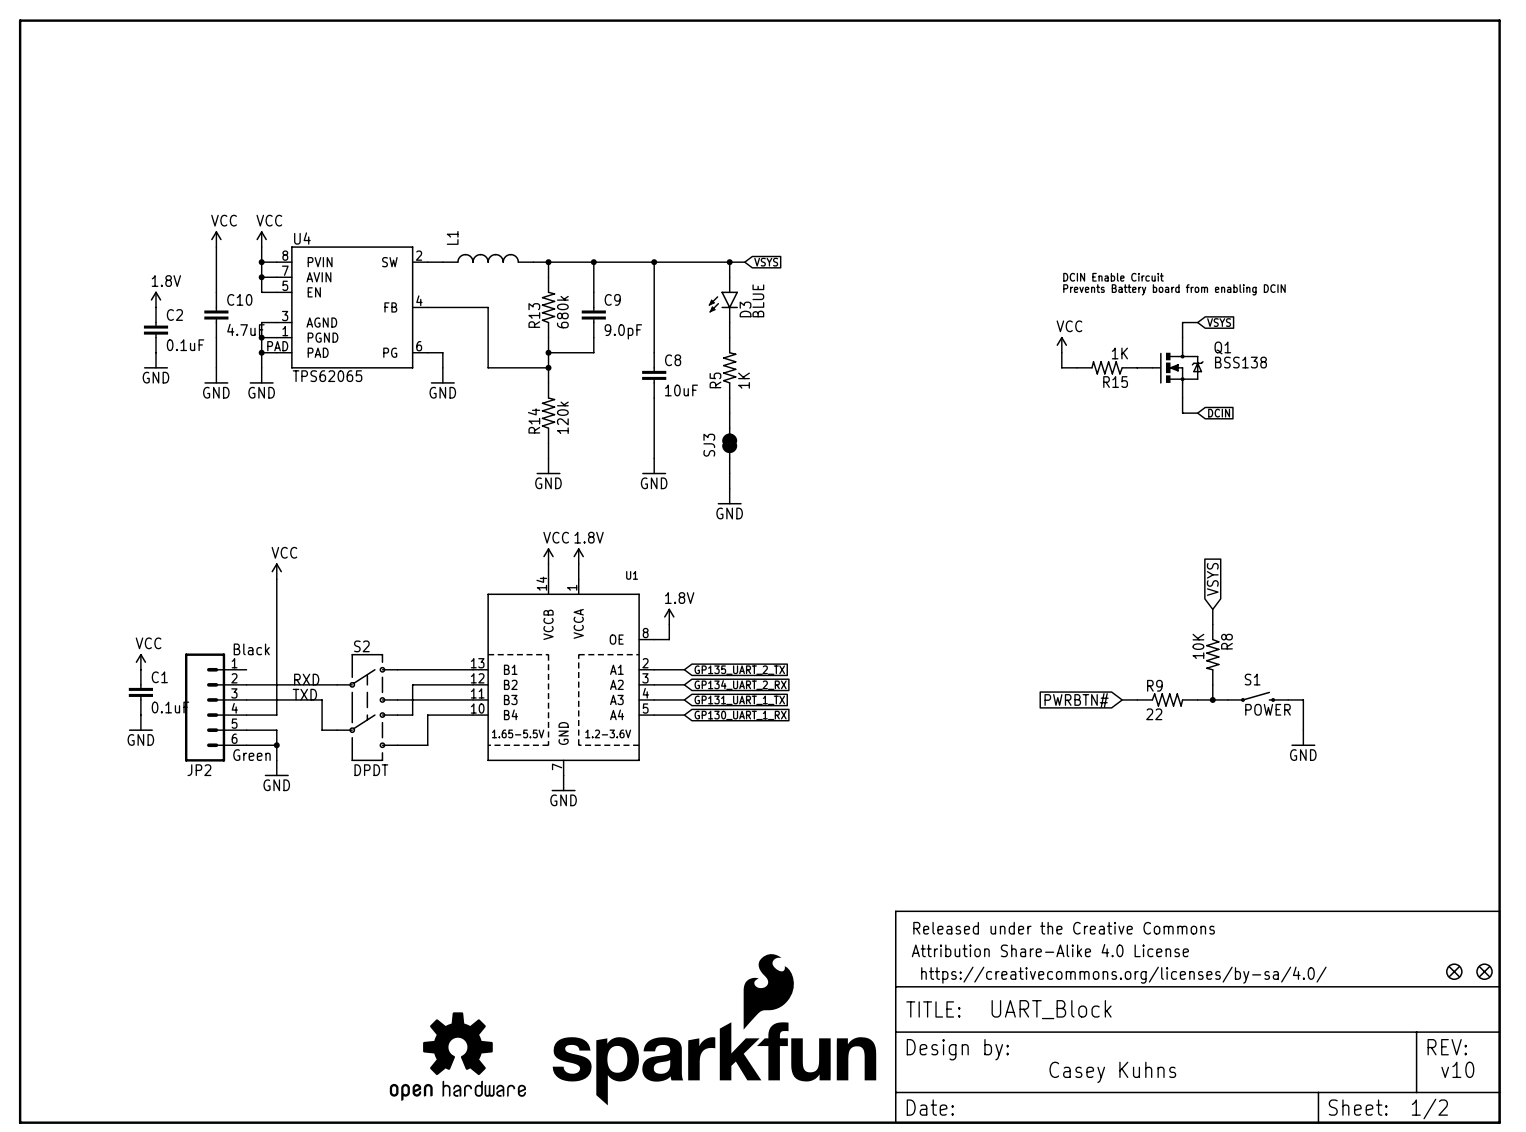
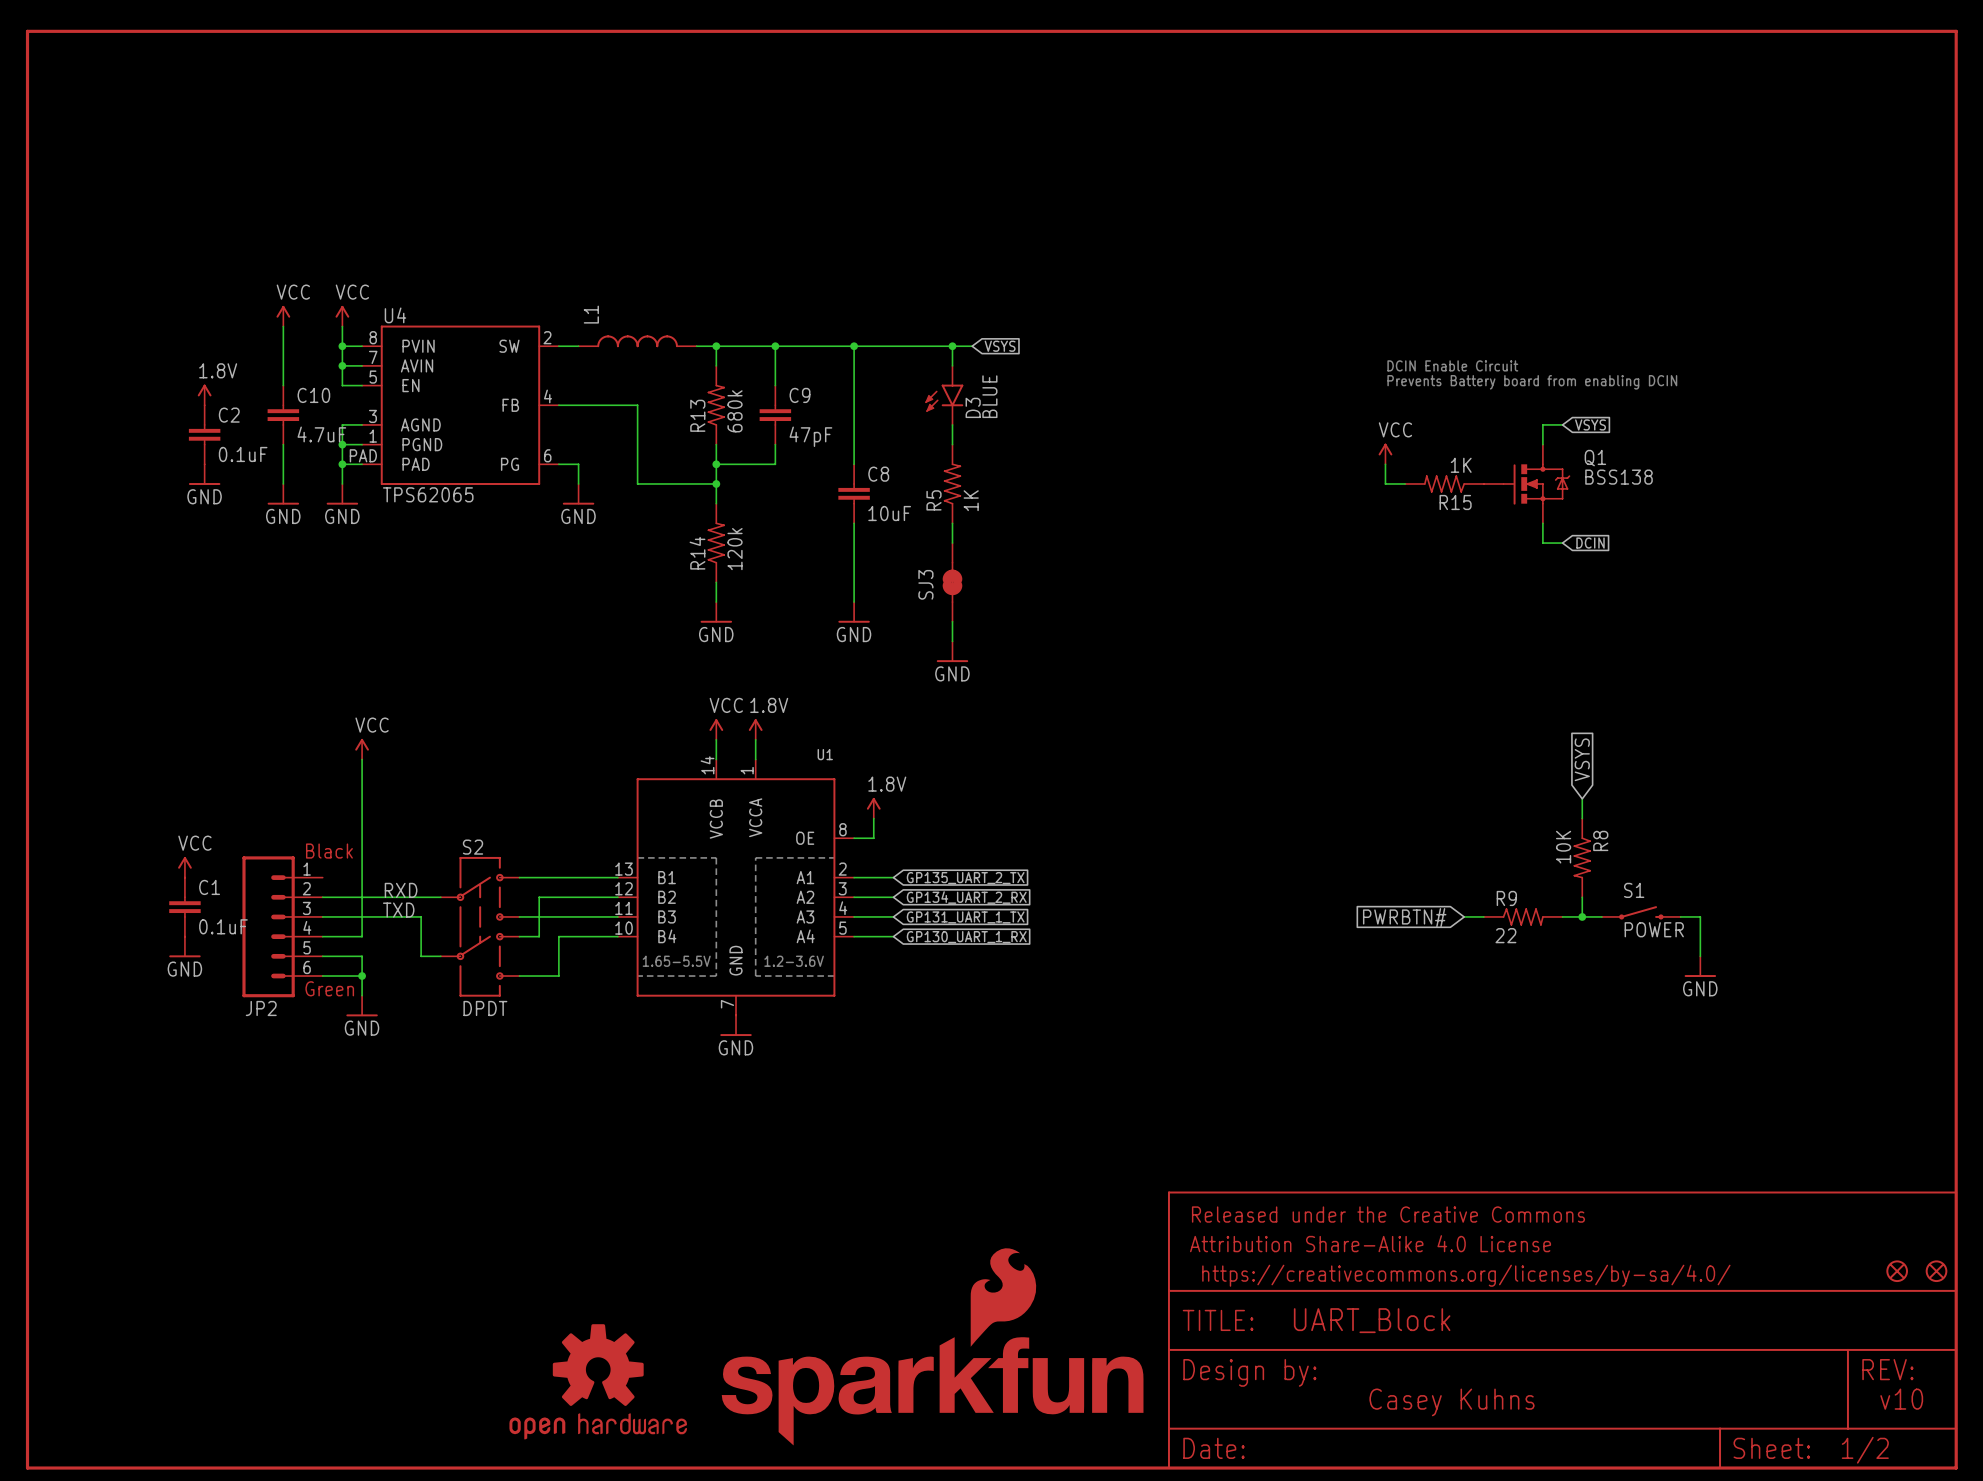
C9 value: 9.0pF (623, 331) -> 47pF (810, 436)

